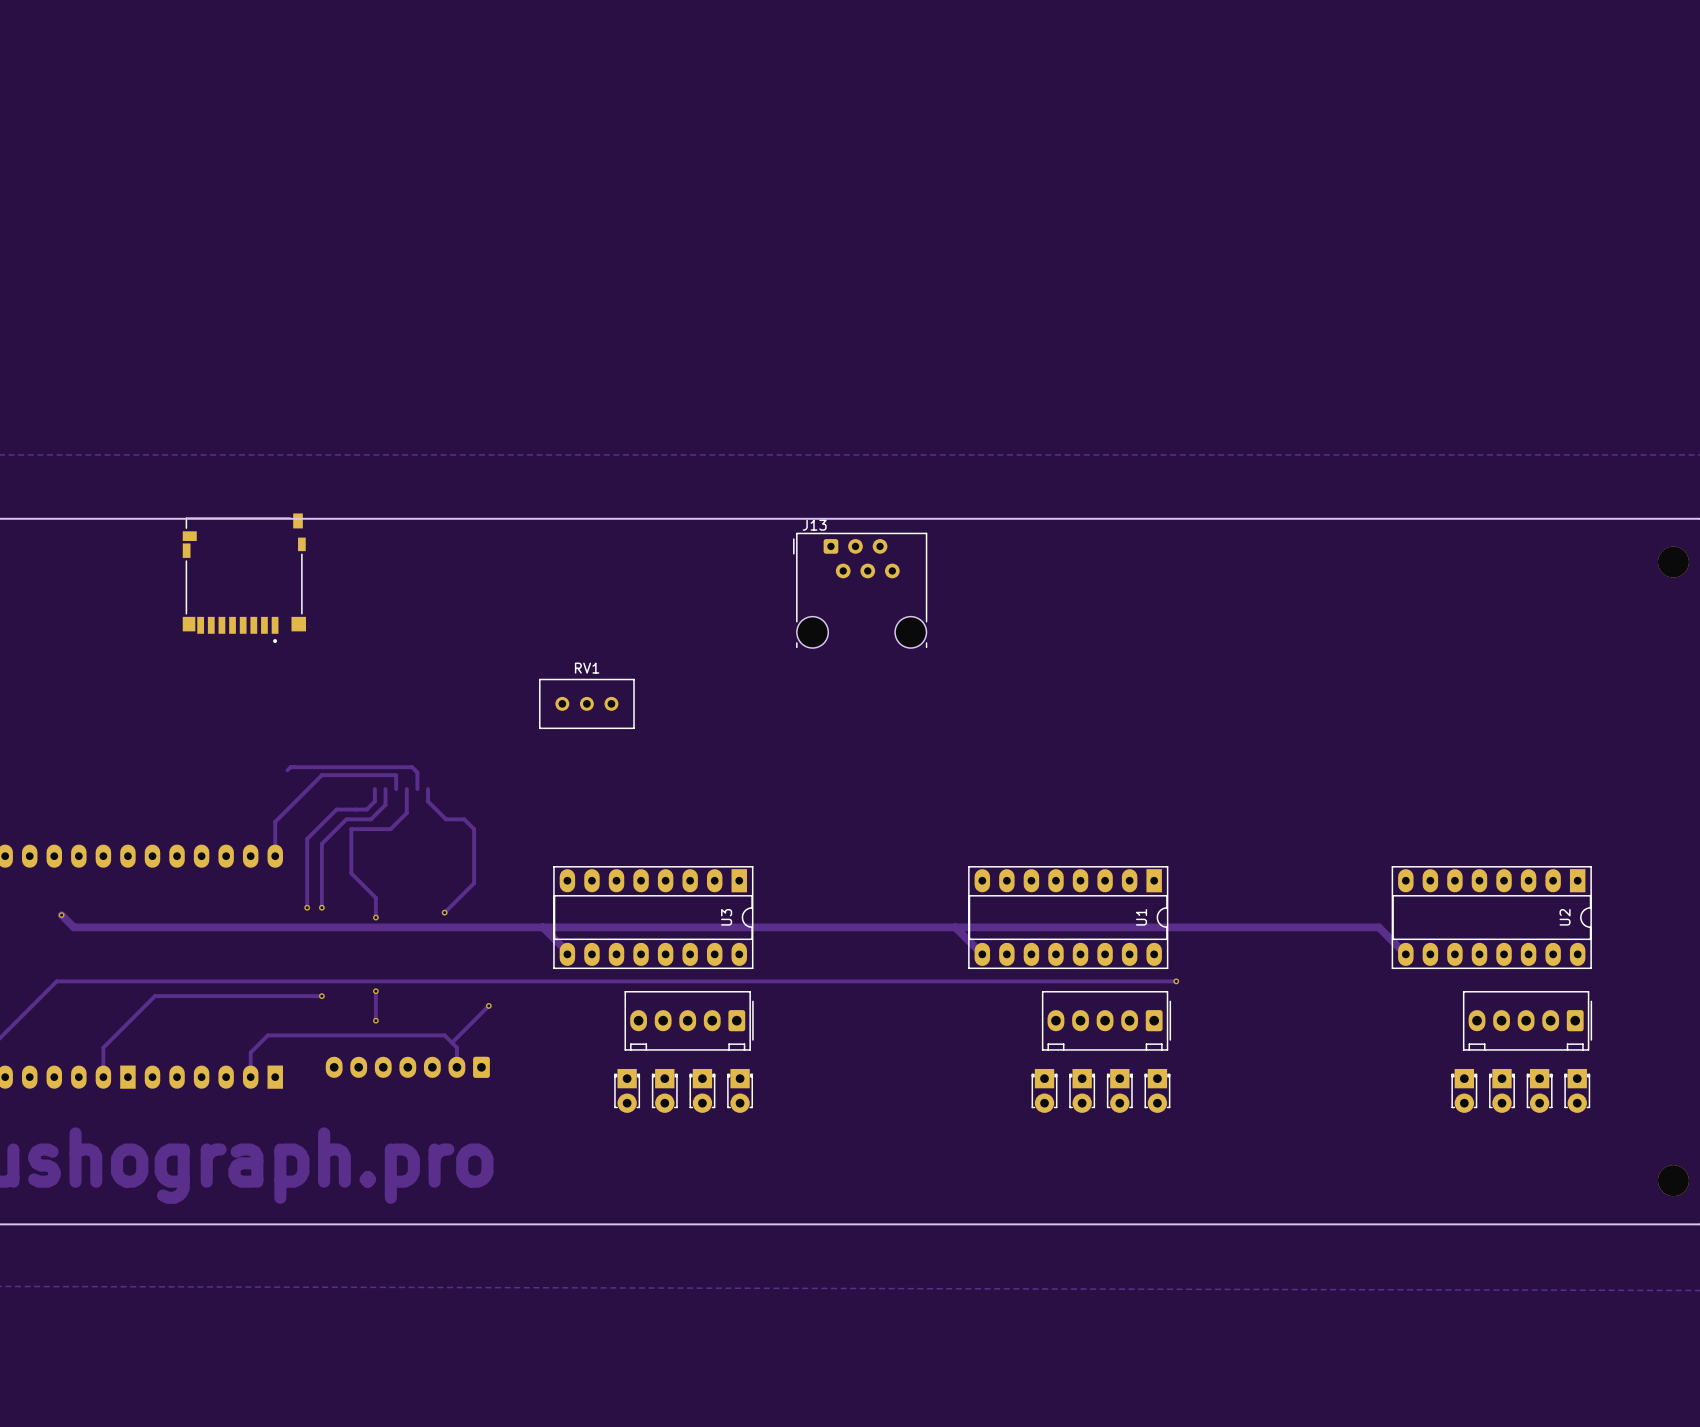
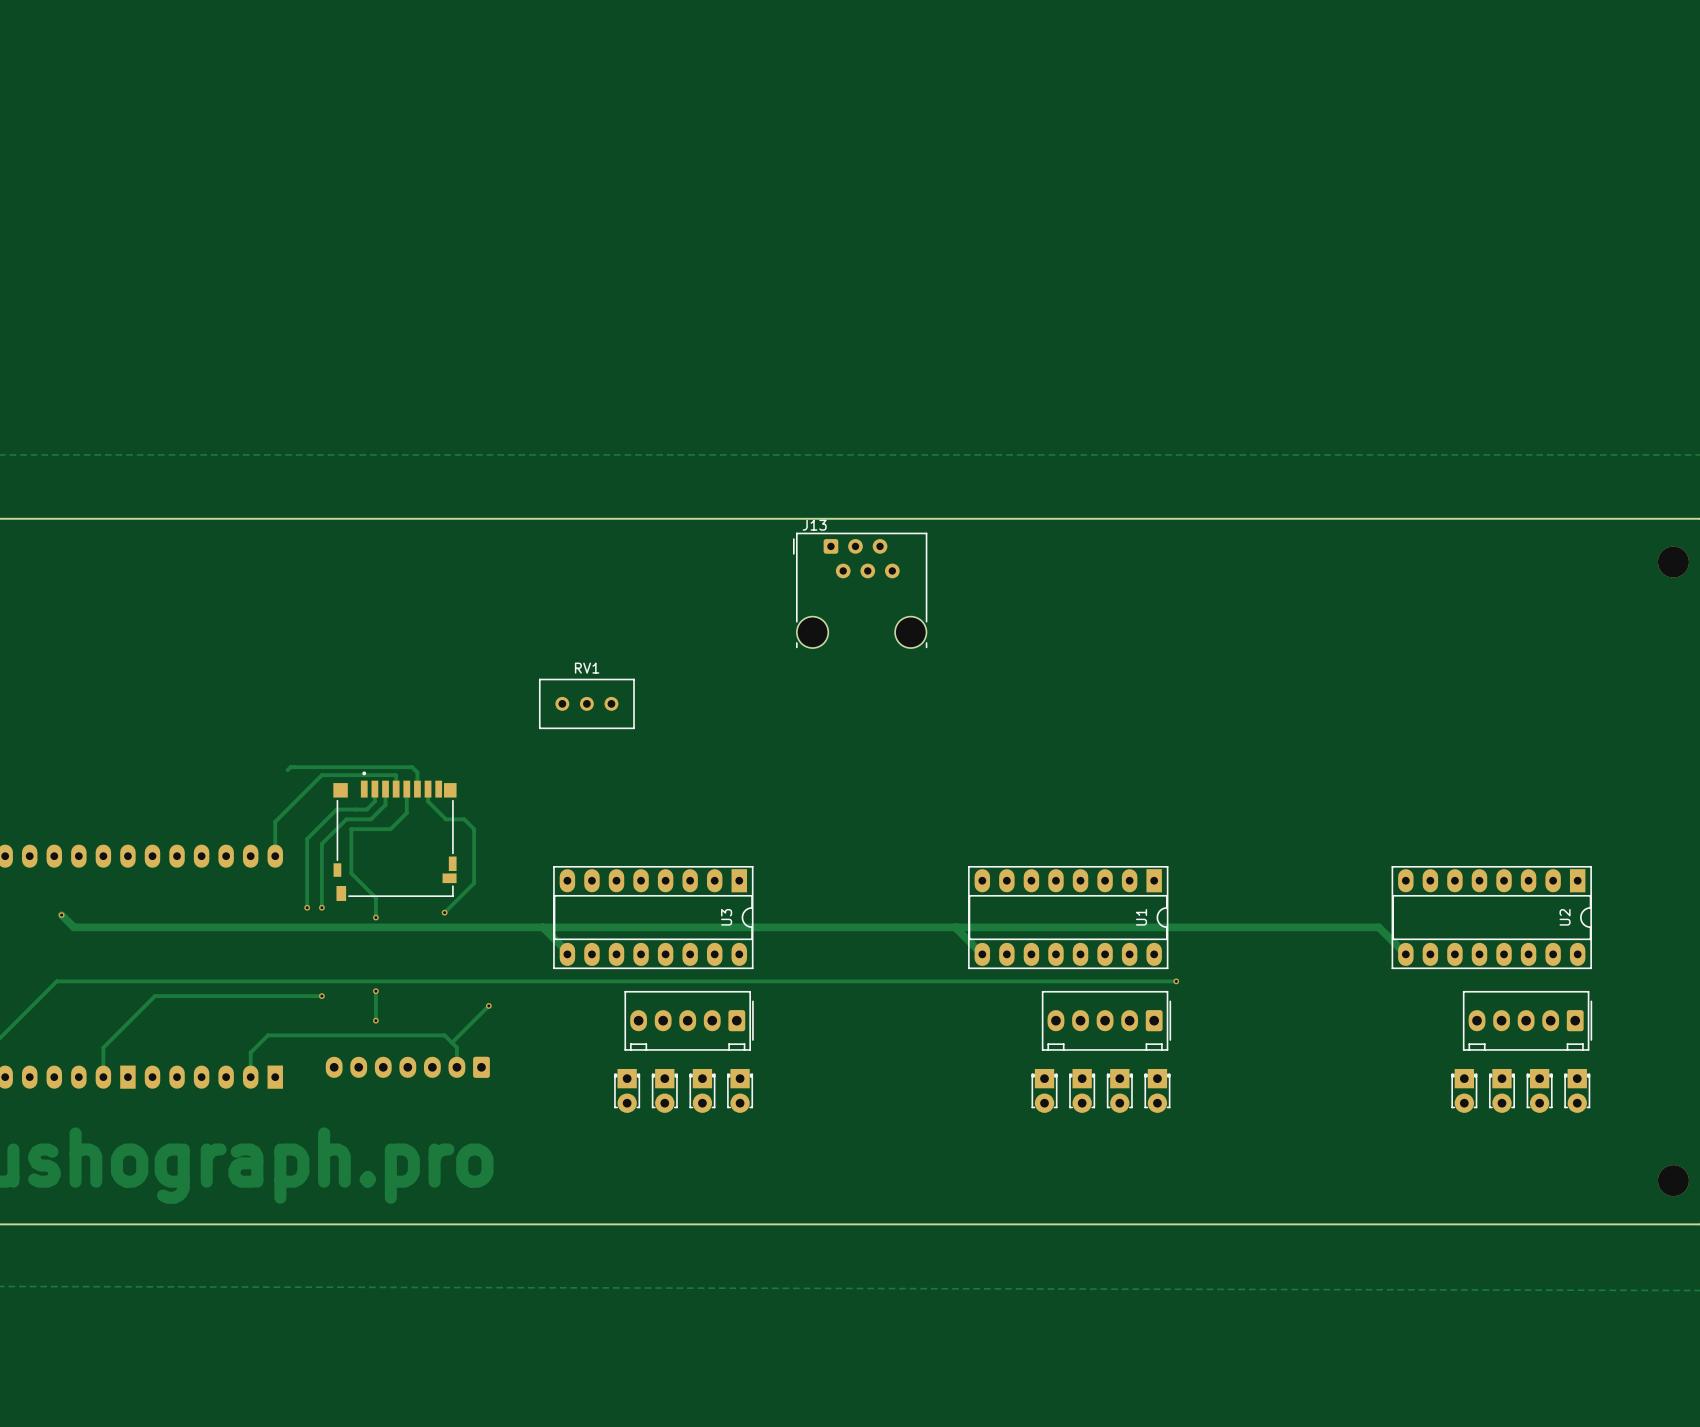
part: (244, 578) -> none
part: none -> (394, 836)

